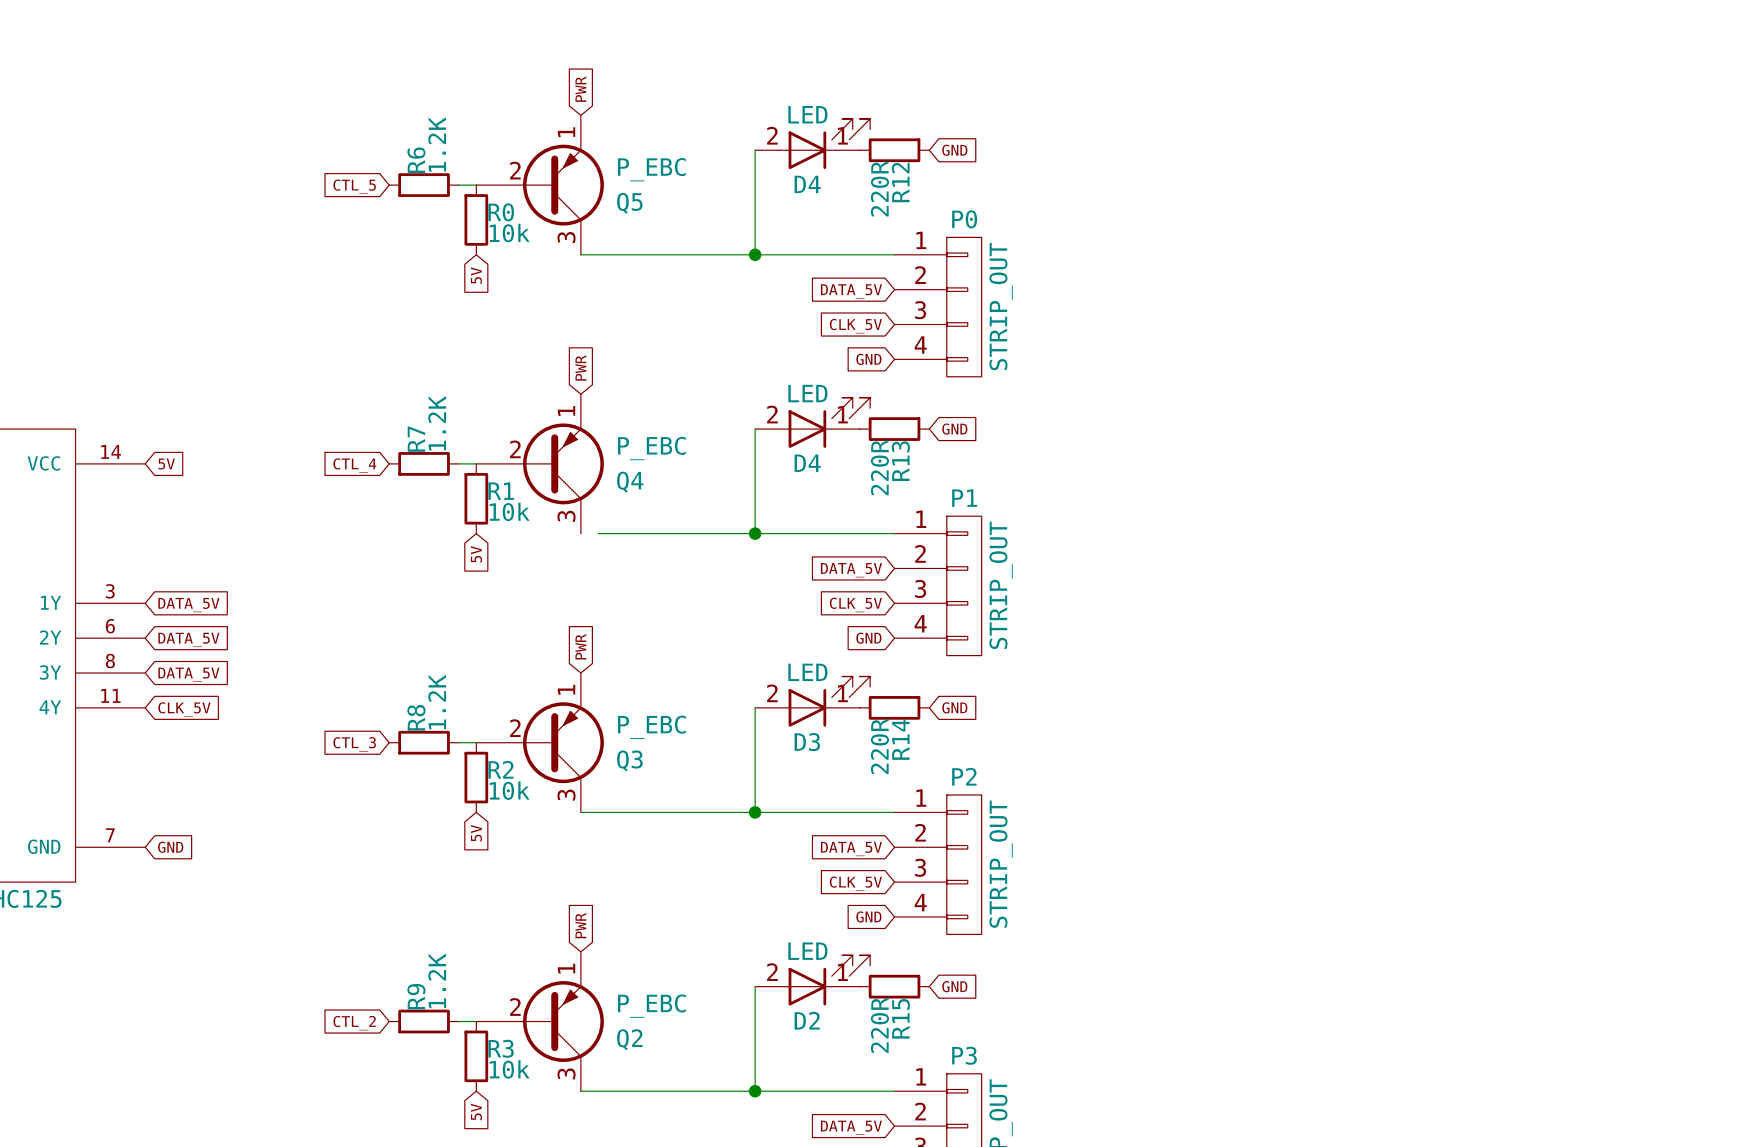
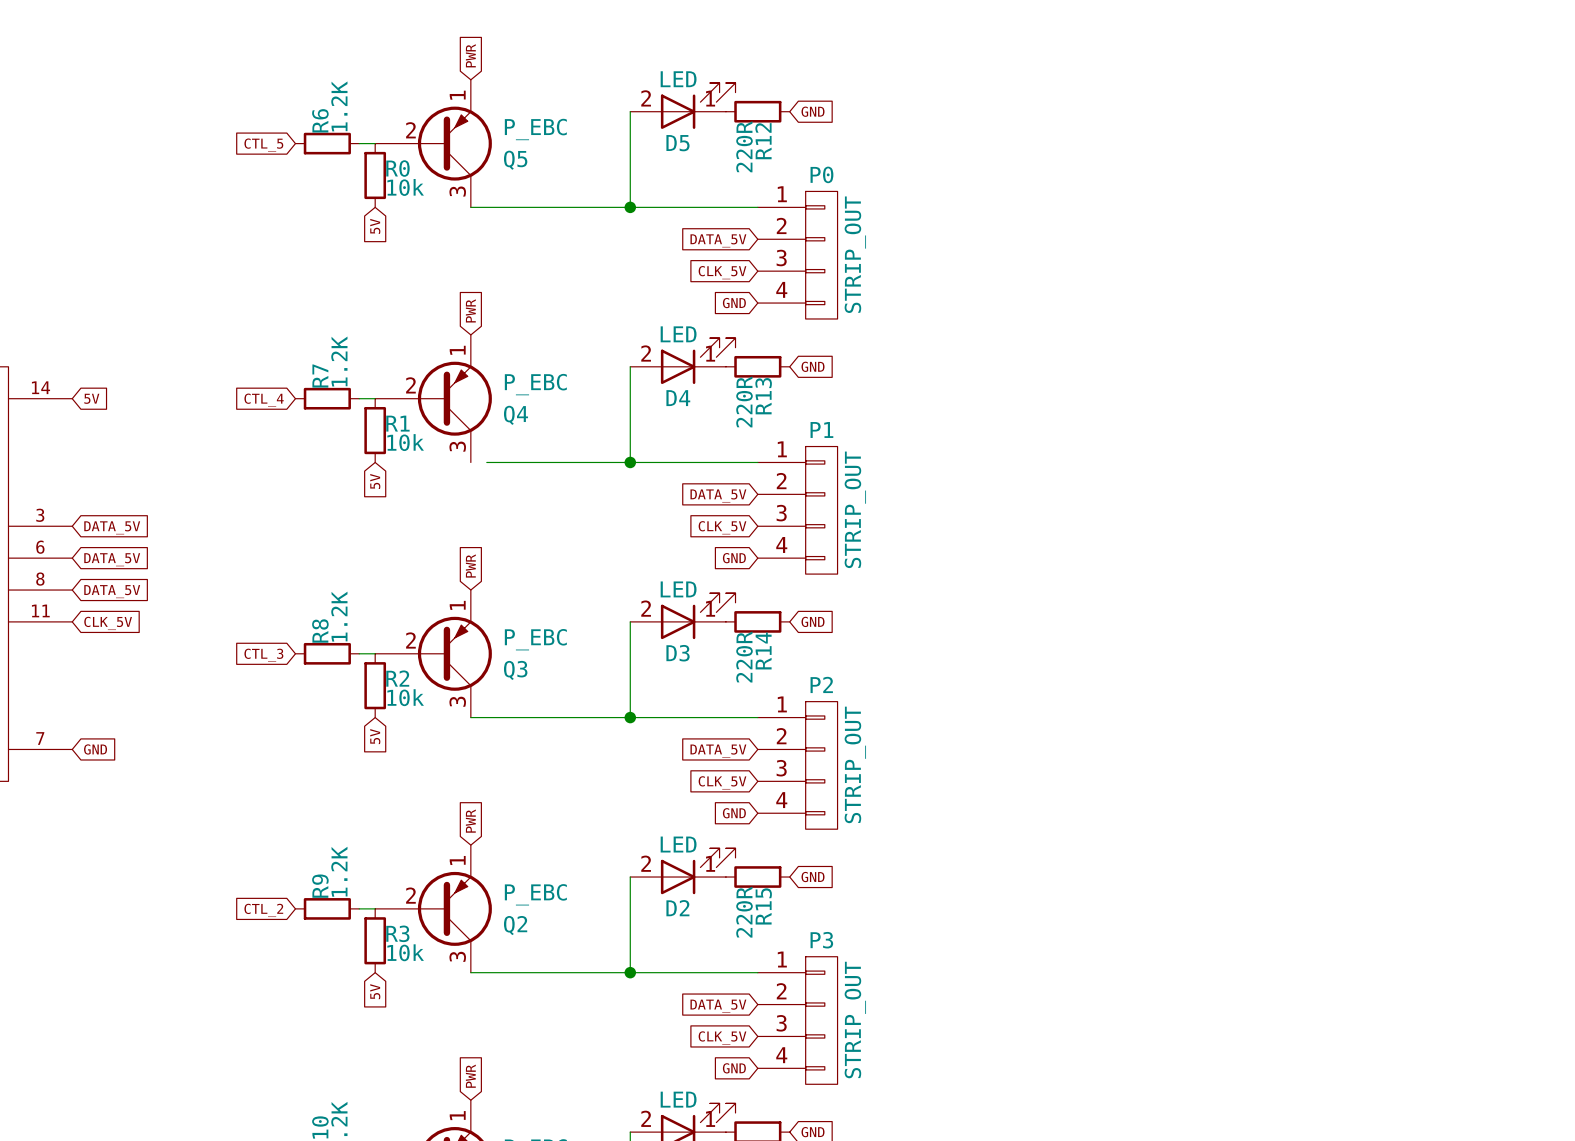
D4 name: D4 (807, 184) -> D5 (677, 143)

